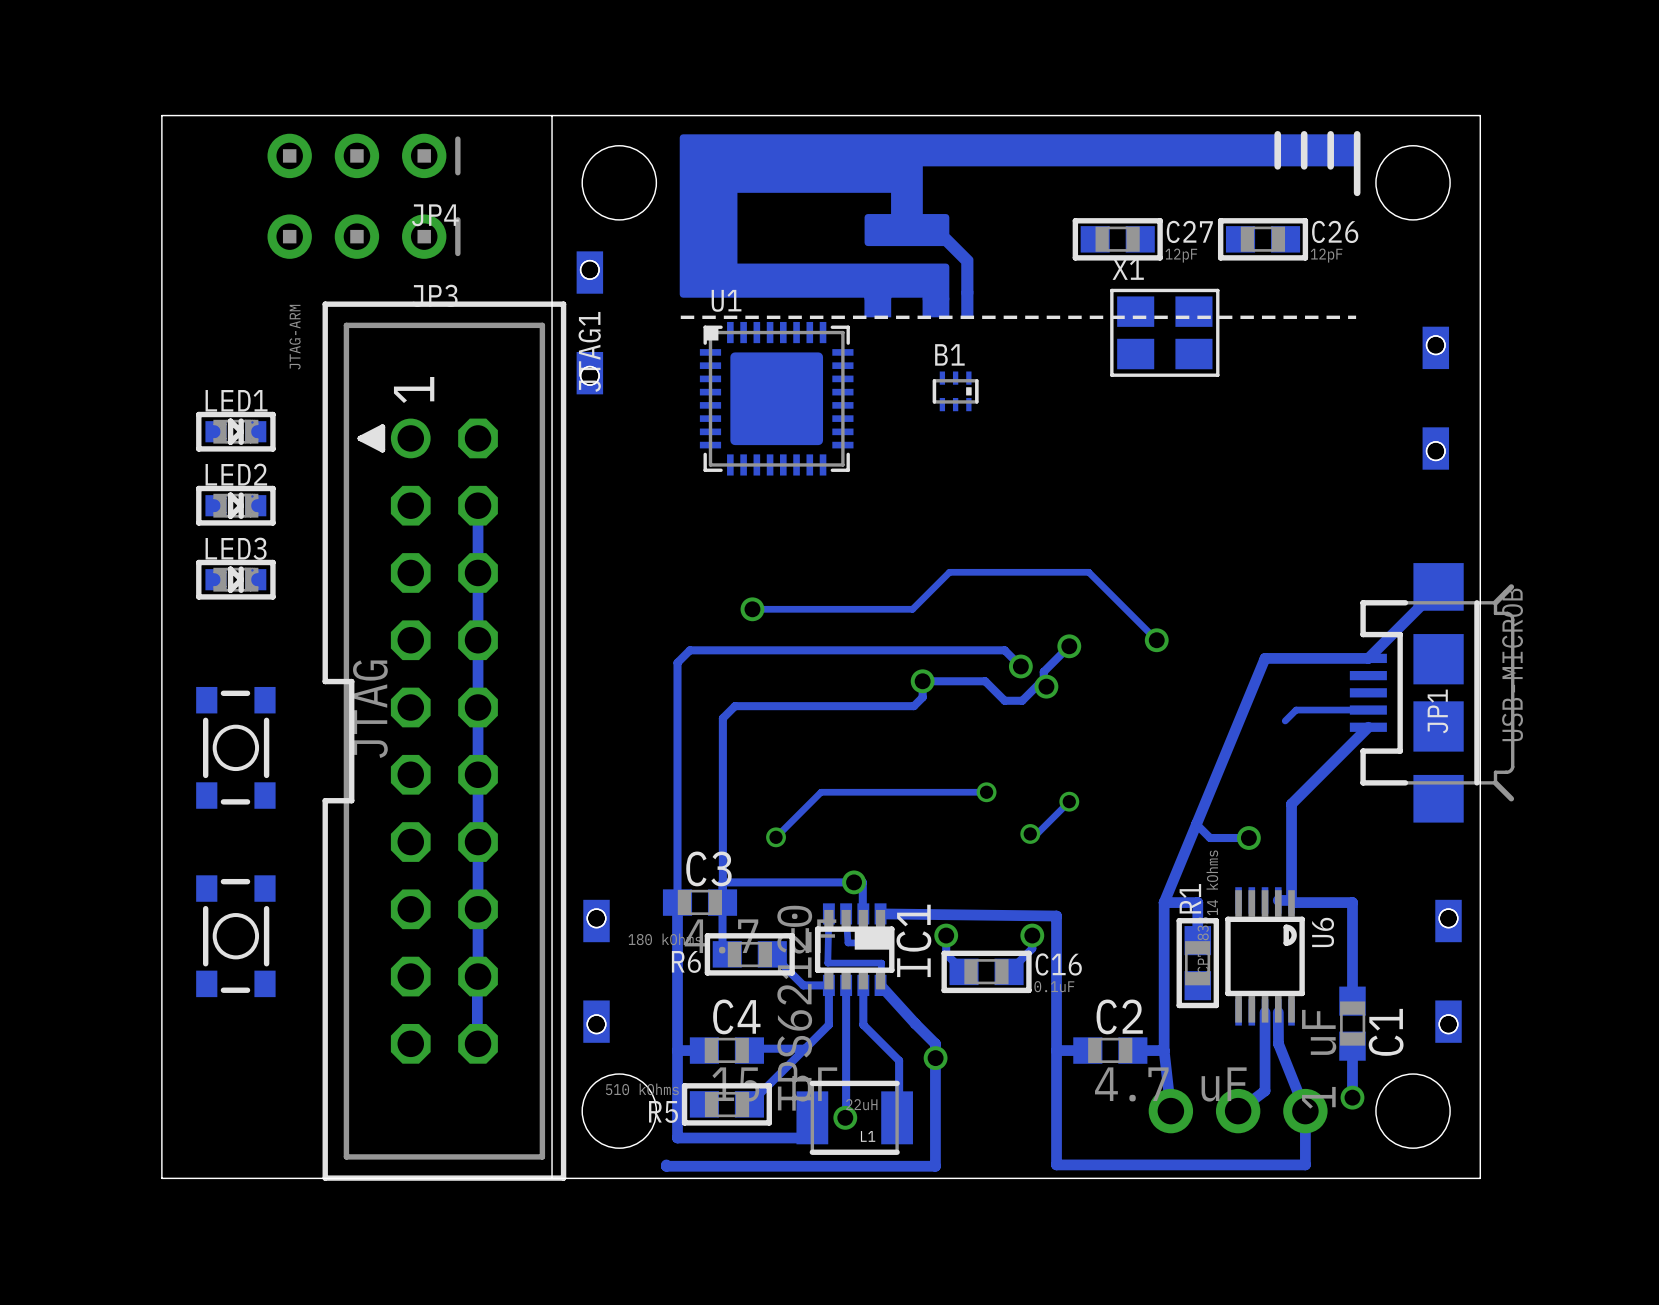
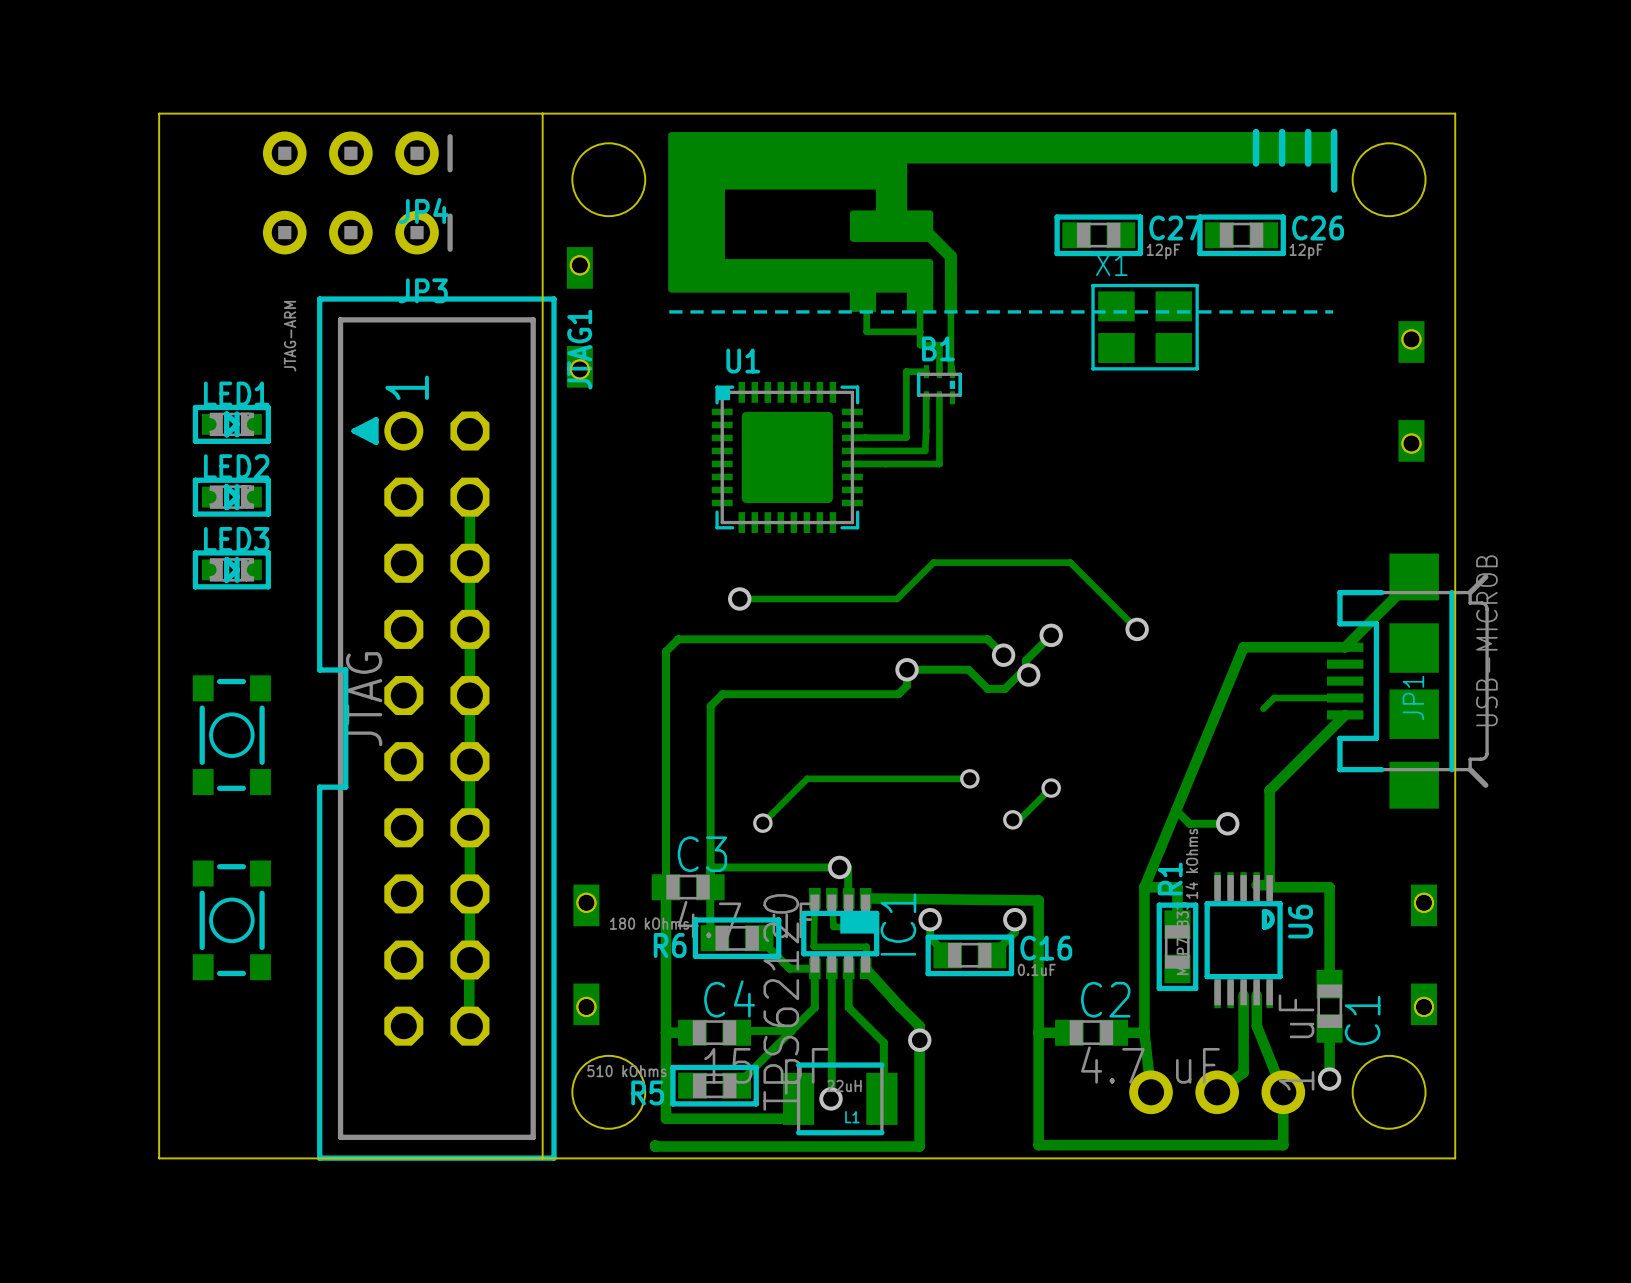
track: none -> (950, 298) (950, 371) (952, 371)
track: none -> (866, 302) (866, 331) (920, 331)
track: none -> (920, 302) (920, 345) (939, 345) (939, 371)
track: none -> (906, 371) (906, 437) (852, 437)
track: none -> (926, 371) (906, 371)
U1 position: (776, 398) -> (787, 457)
track: none -> (926, 397) (925, 450) (852, 450)
track: none -> (939, 397) (939, 464) (852, 463)

